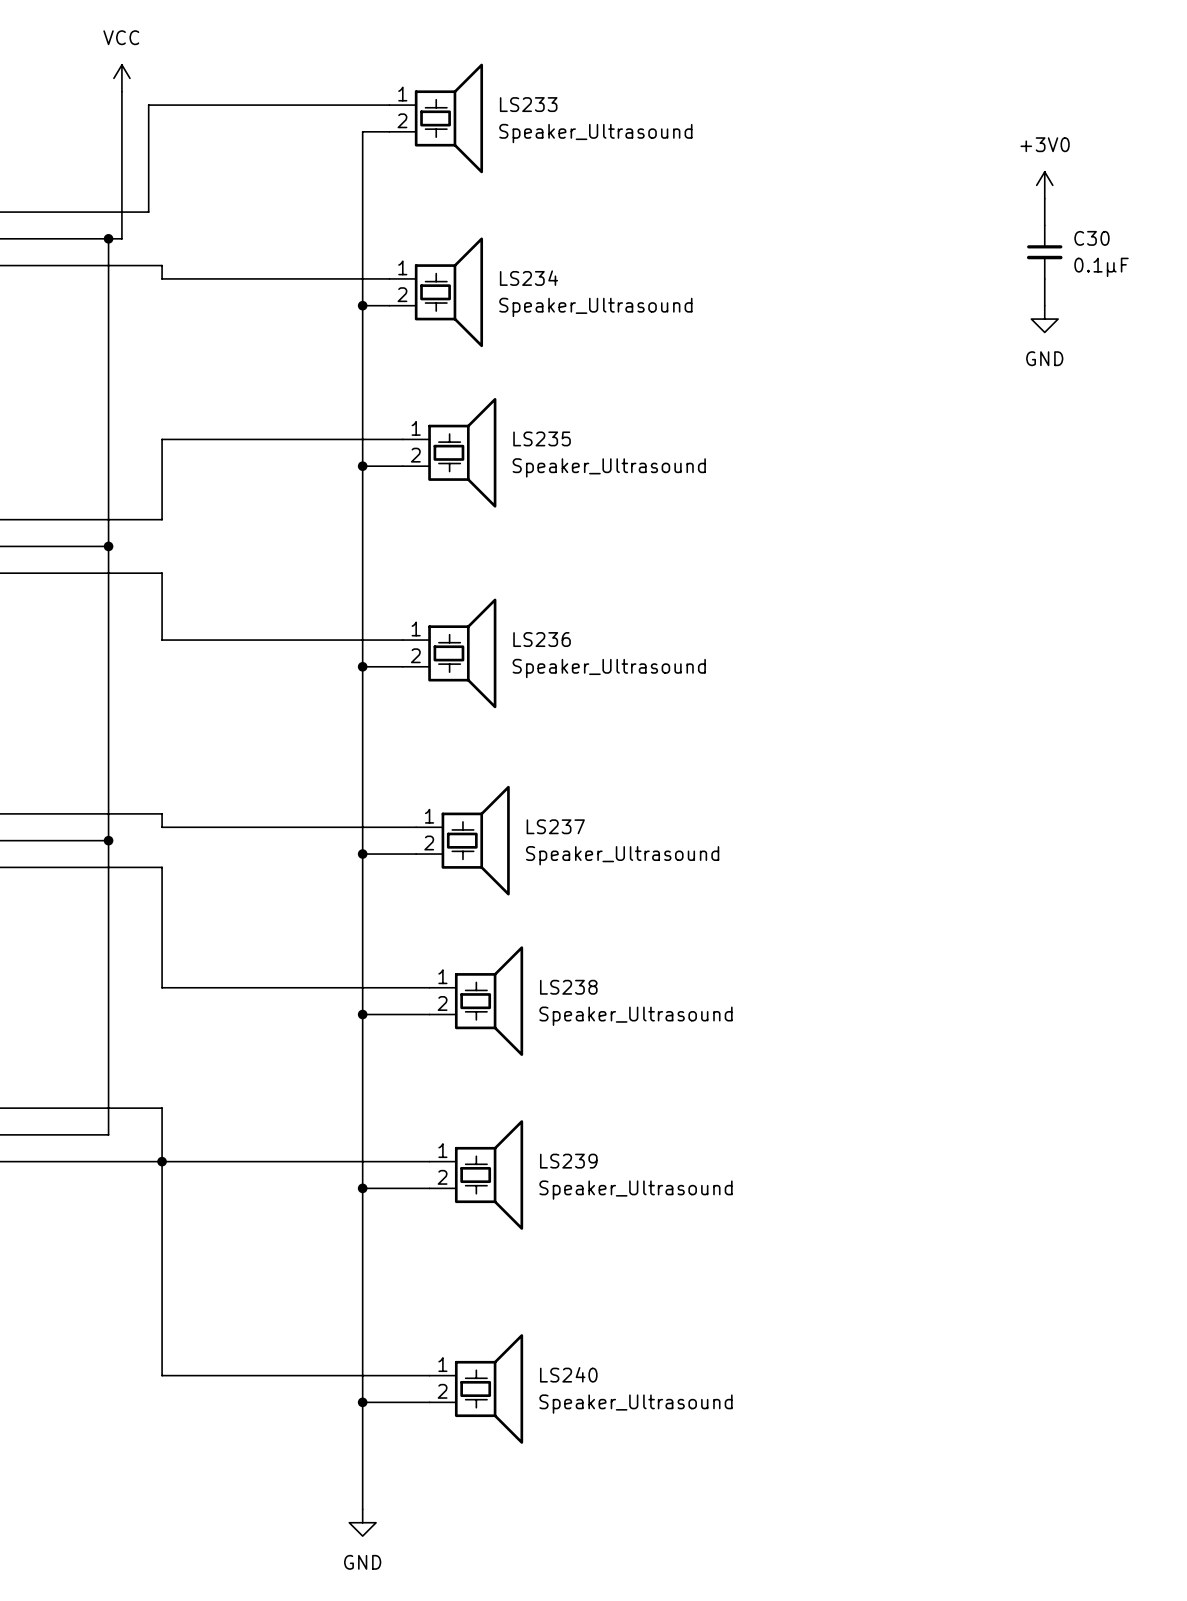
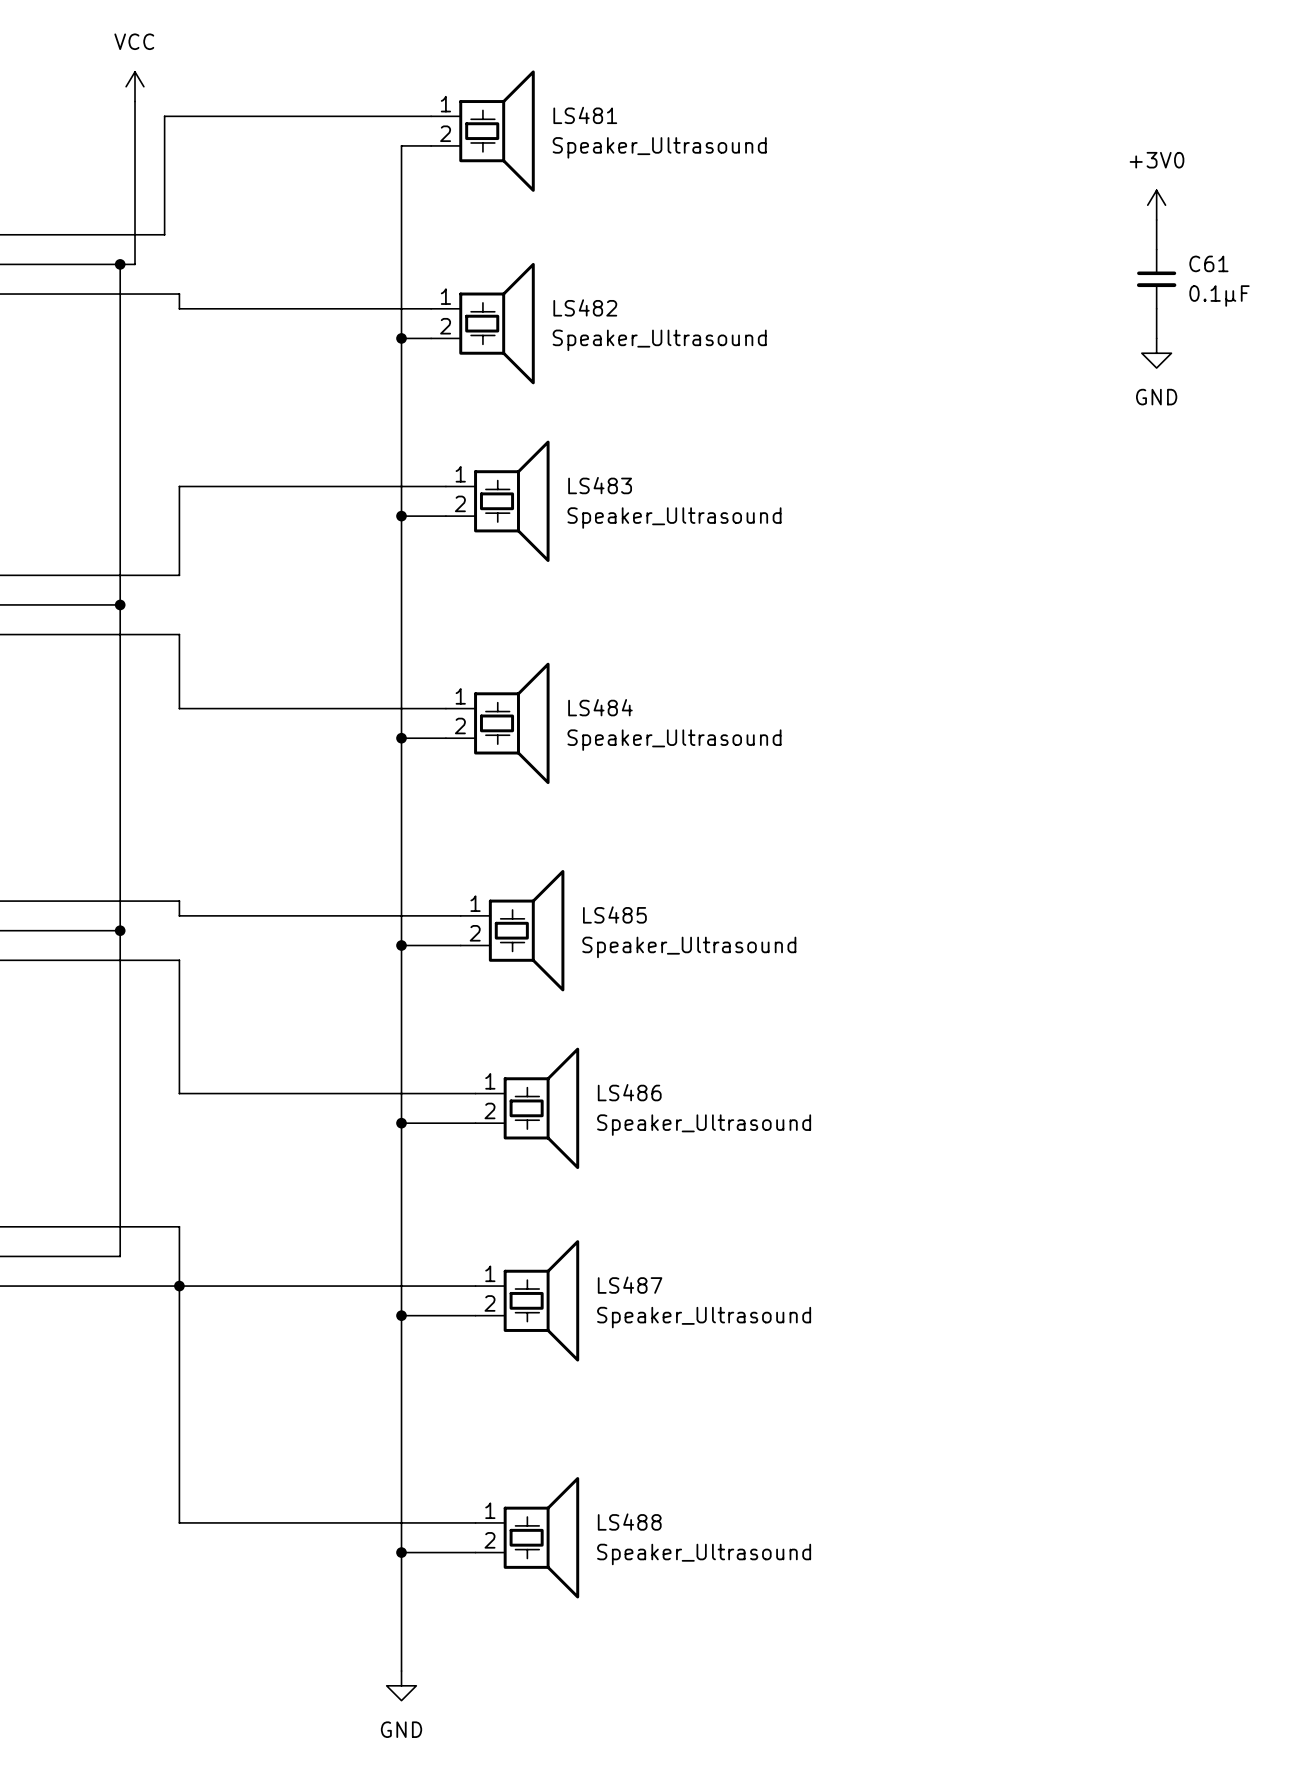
LS233 name: LS233 (528, 104) -> LS481 (585, 115)
C30 name: C30 (1091, 238) -> C61 (1208, 263)
LS234 name: LS234 (528, 278) -> LS482 (585, 307)
LS235 name: LS235 (542, 438) -> LS483 (600, 485)
LS236 name: LS236 (542, 639) -> LS484 (600, 707)
LS237 name: LS237 (555, 826) -> LS485 (614, 914)
LS238 name: LS238 (568, 987) -> LS486 (629, 1092)
LS239 name: LS239 (568, 1161) -> LS487 (630, 1285)
LS240 name: LS240 (568, 1374) -> LS488 (629, 1522)

